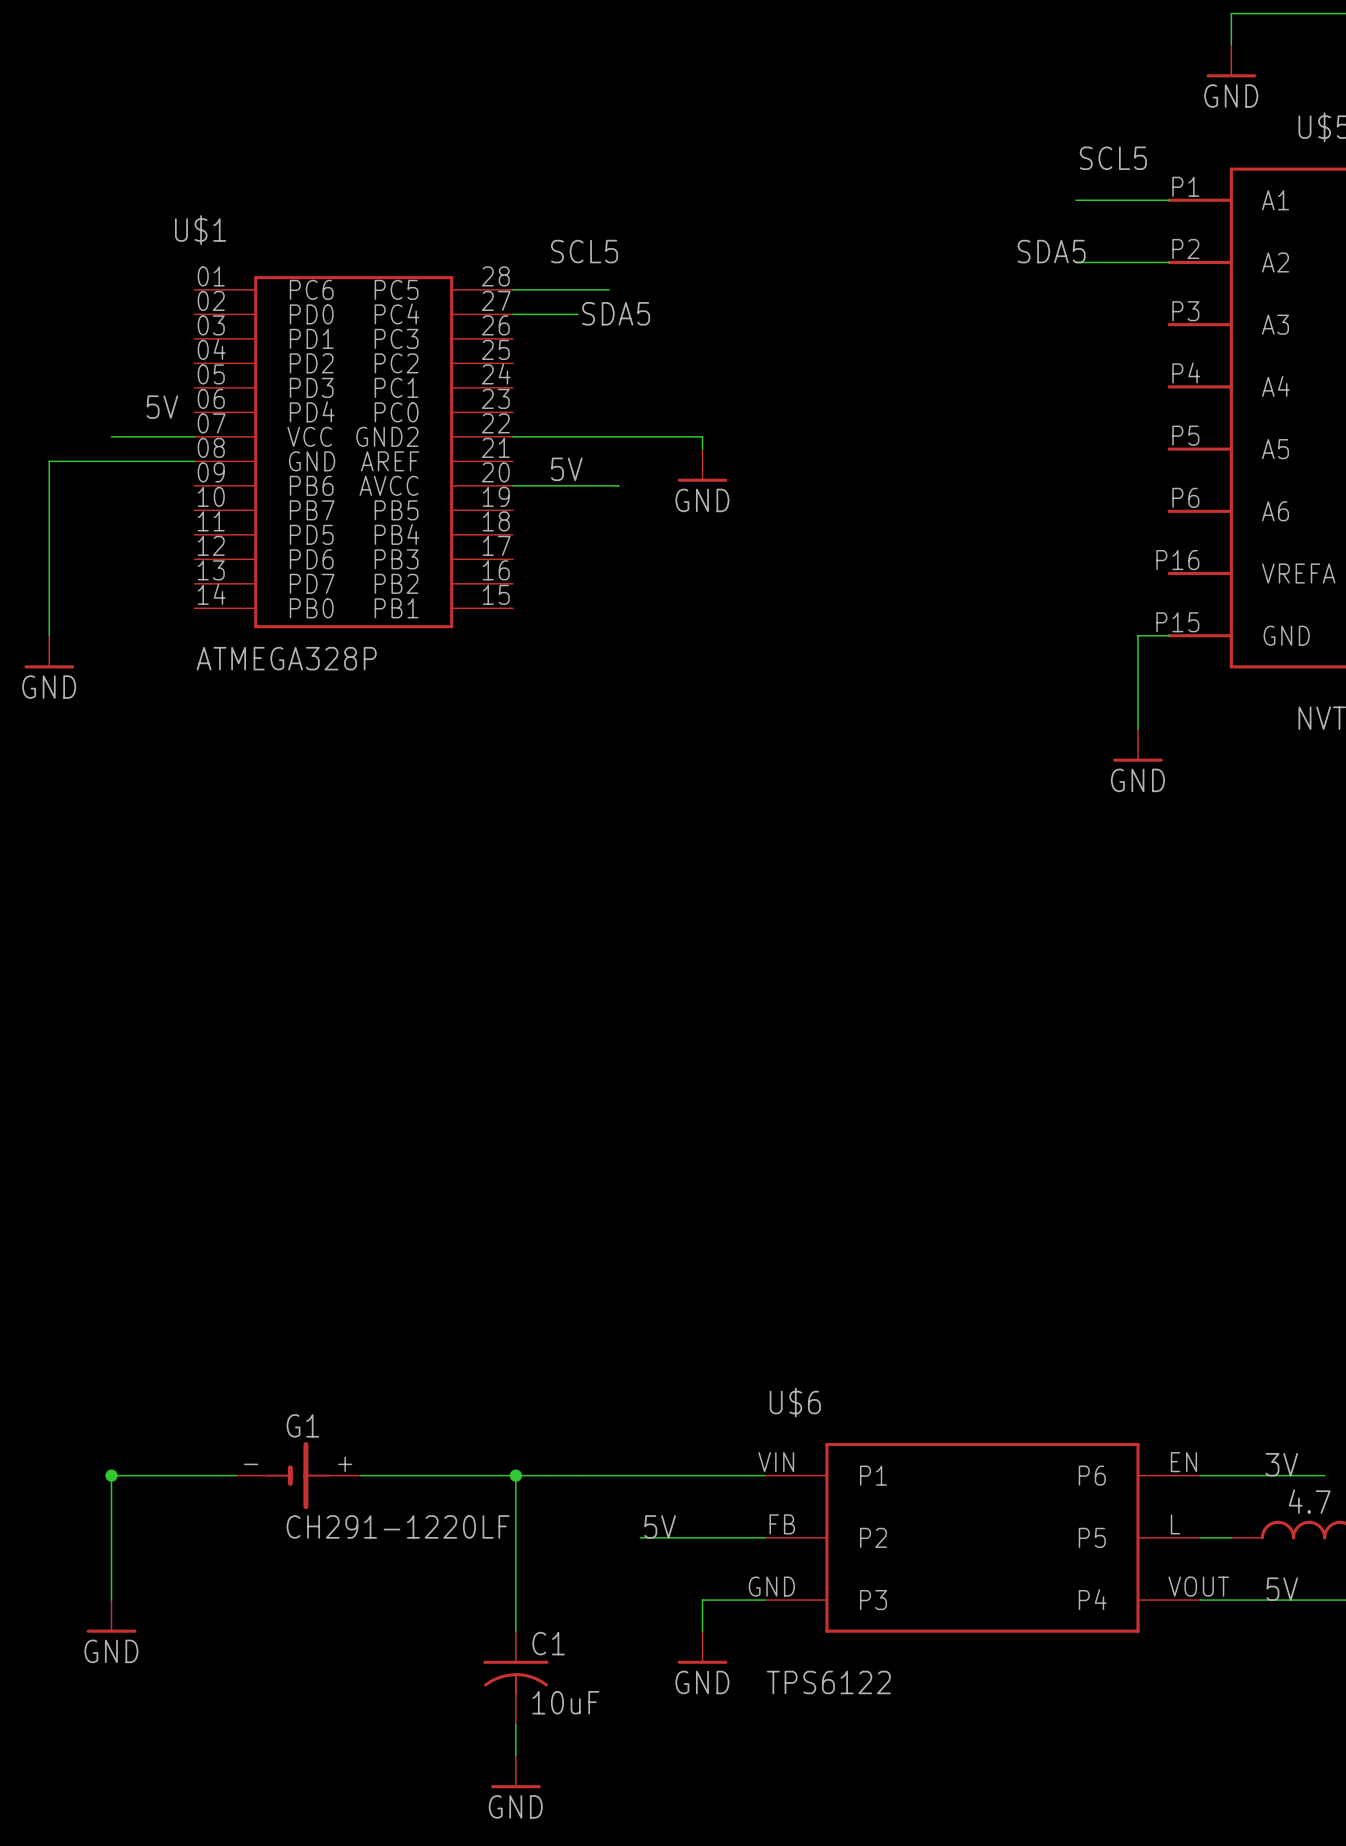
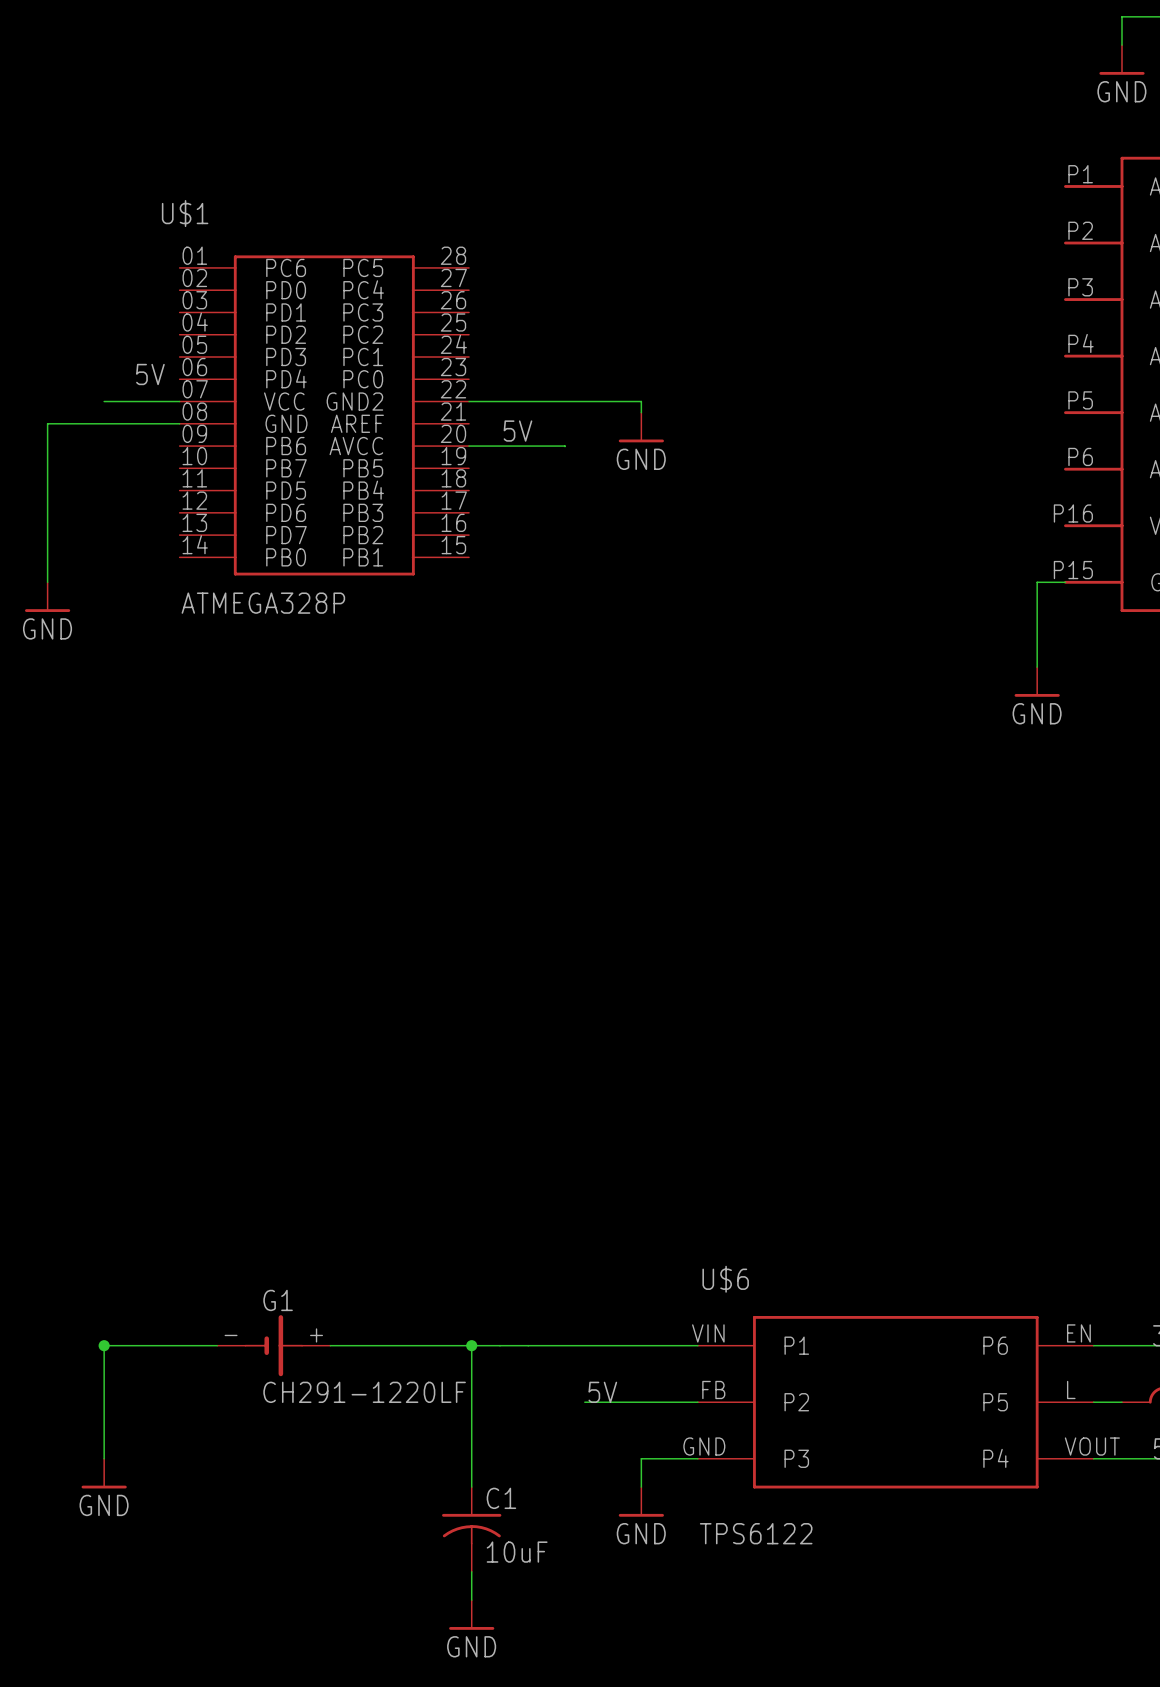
label: SCL5 (1113, 158) -> none
wire: (1075, 200) (1169, 200) -> none
label: SCL5 (584, 251) -> none
label: SDA5 (1051, 251) -> none
wire: (1075, 262) (1169, 262) -> none
wire: (512, 289) (609, 289) -> none
label: SDA5 (616, 313) -> none
wire: (512, 314) (578, 314) -> none

